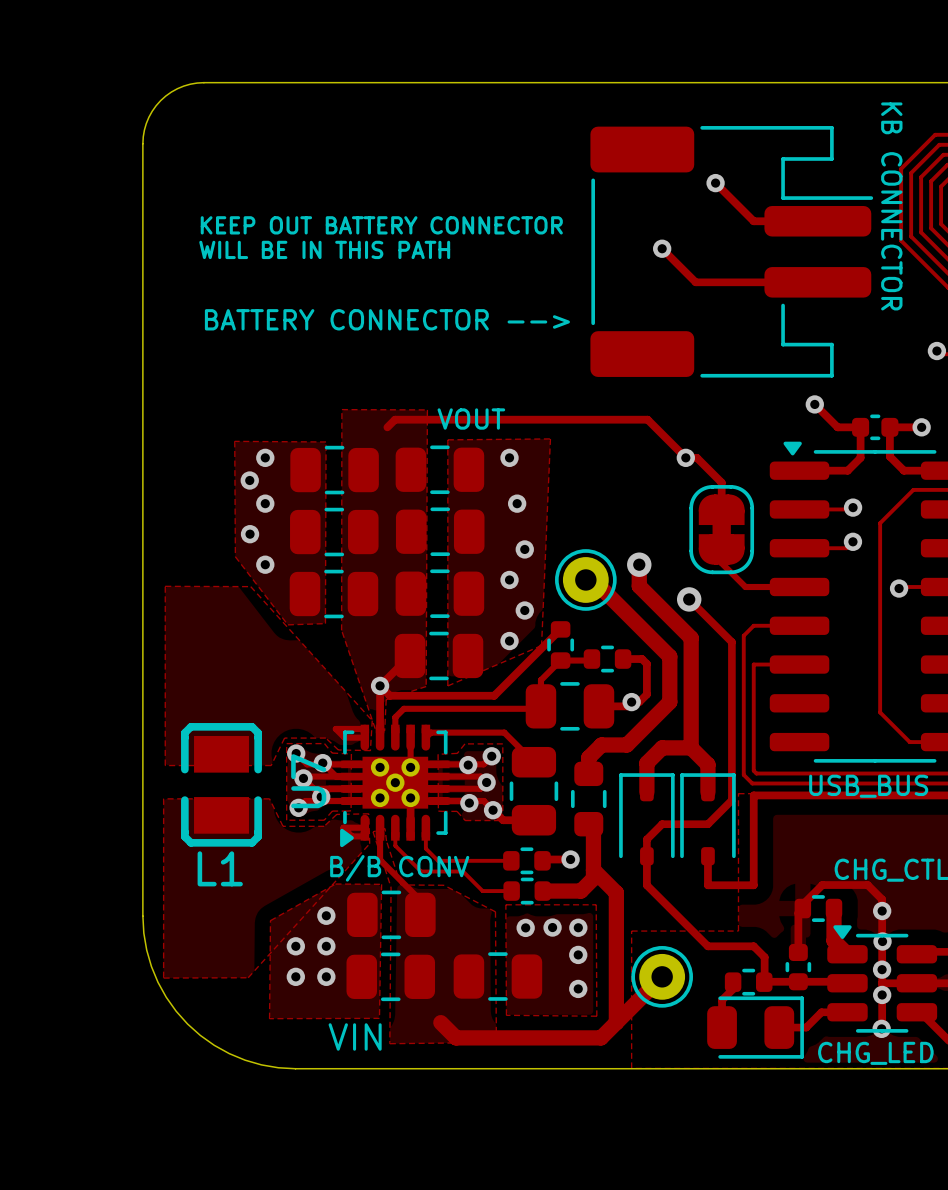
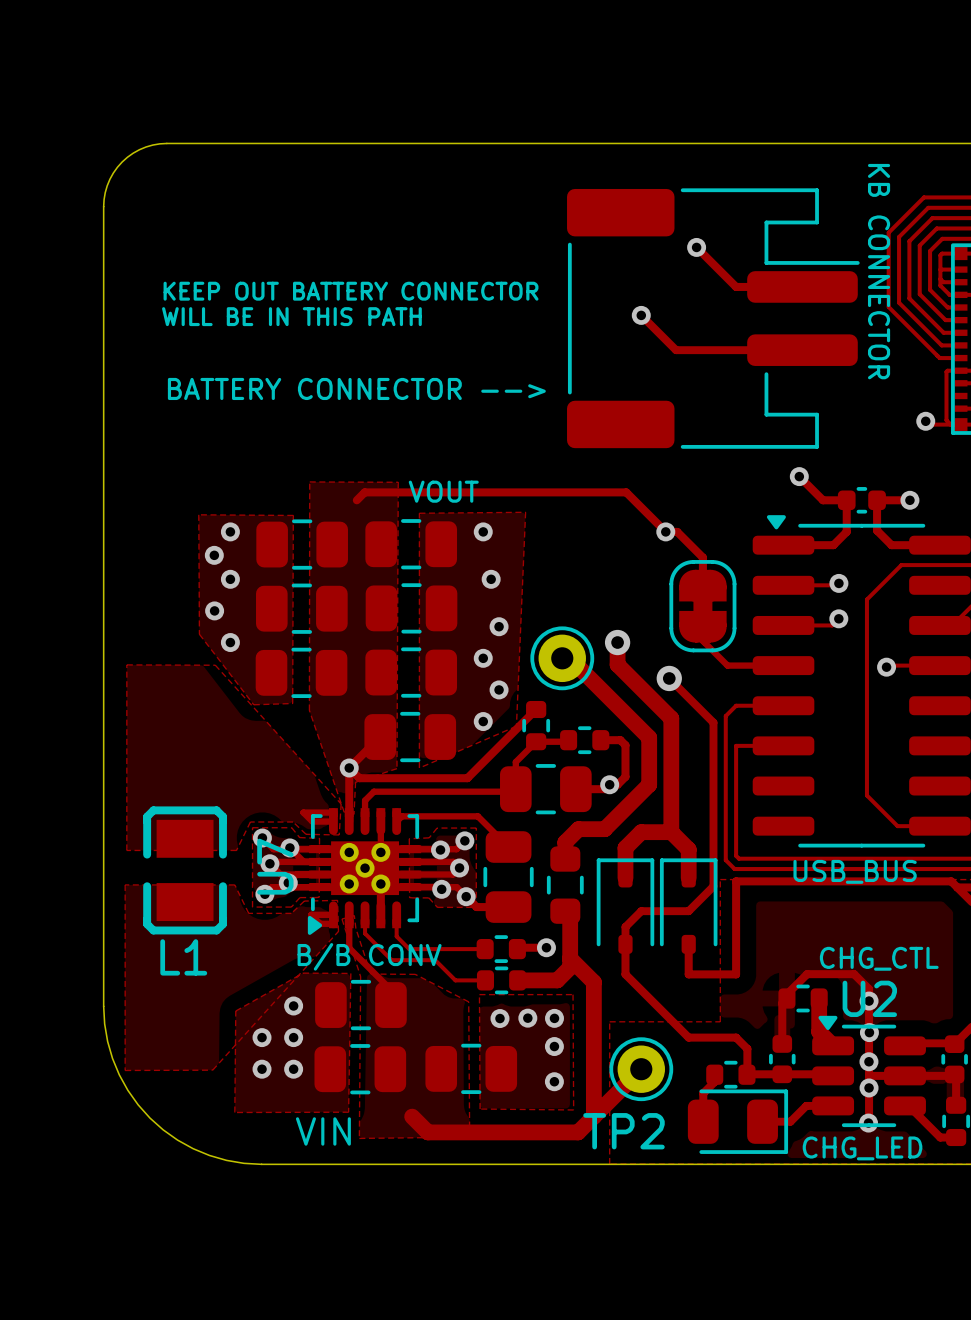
U2 name: none -> U2 (869, 998)
TP2 name: none -> TP2 (623, 1131)

